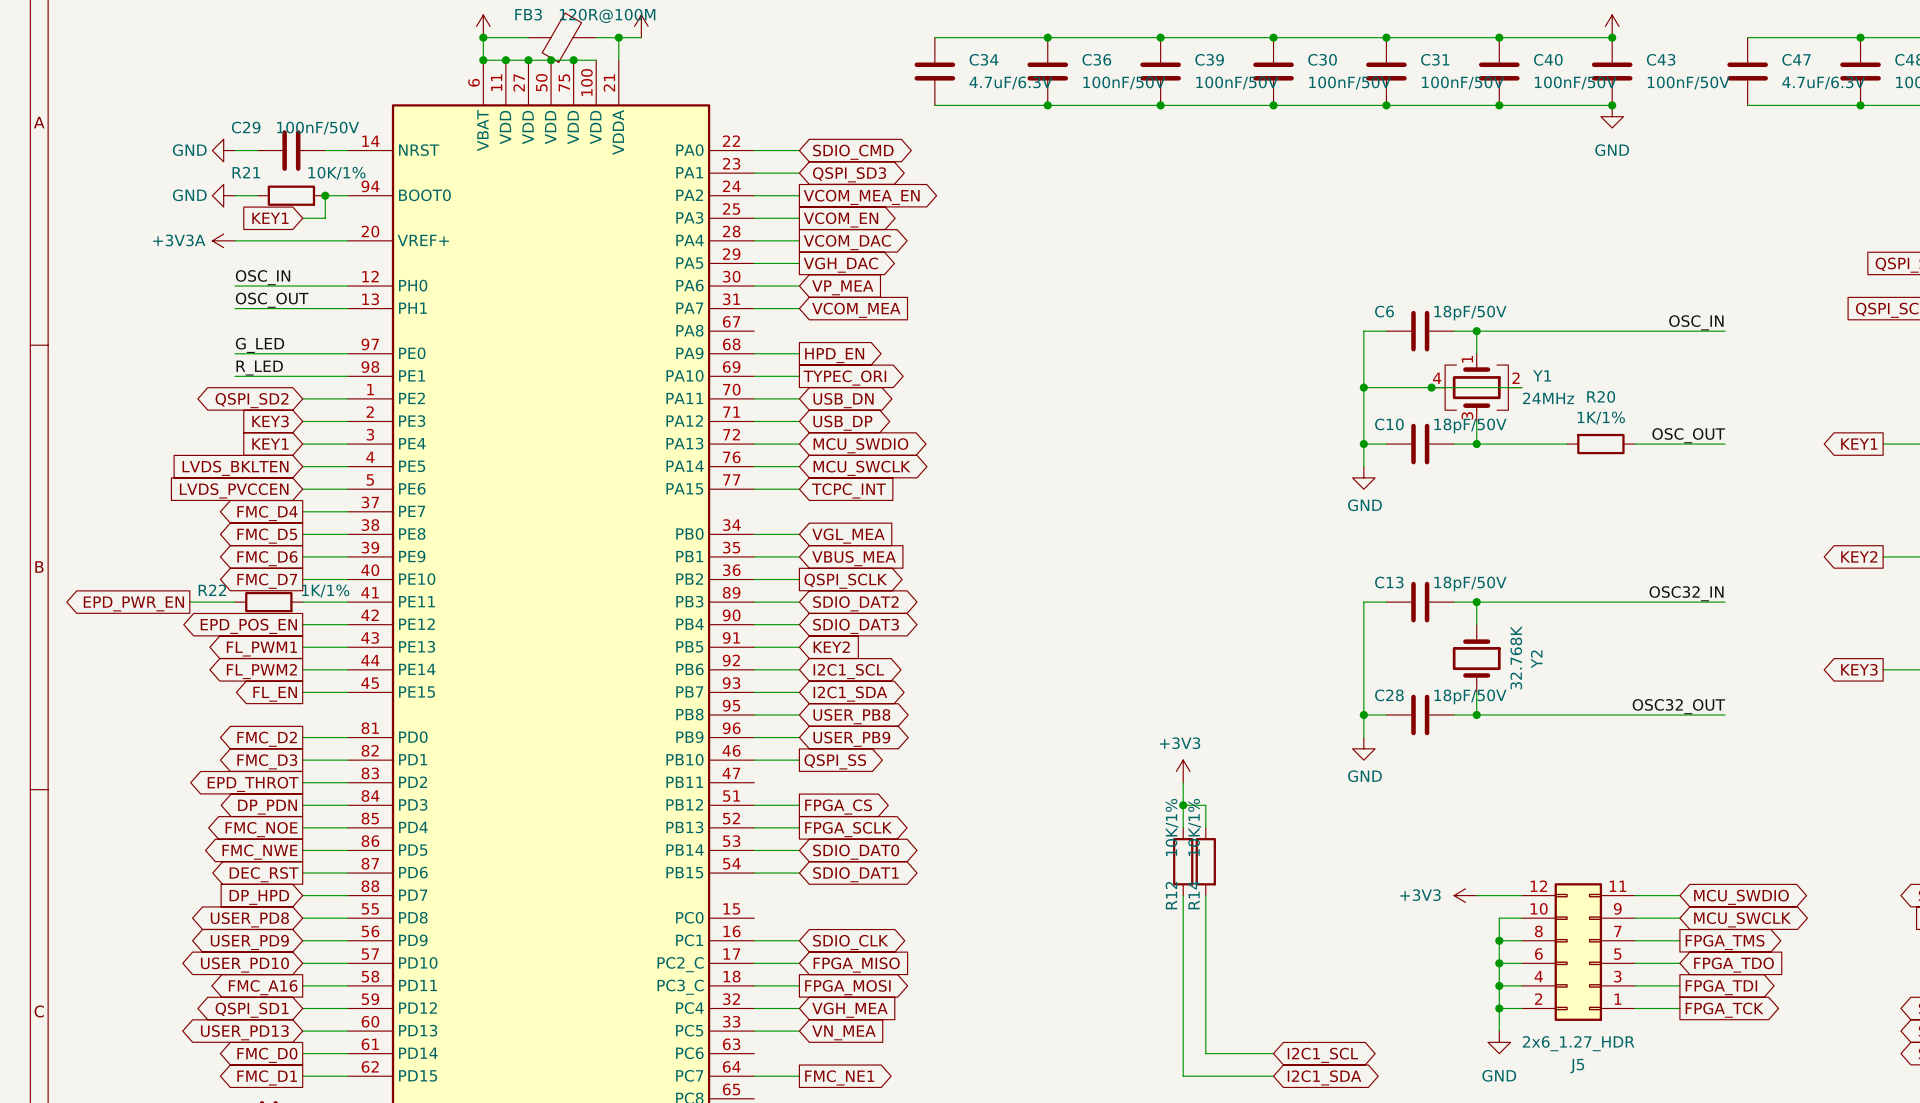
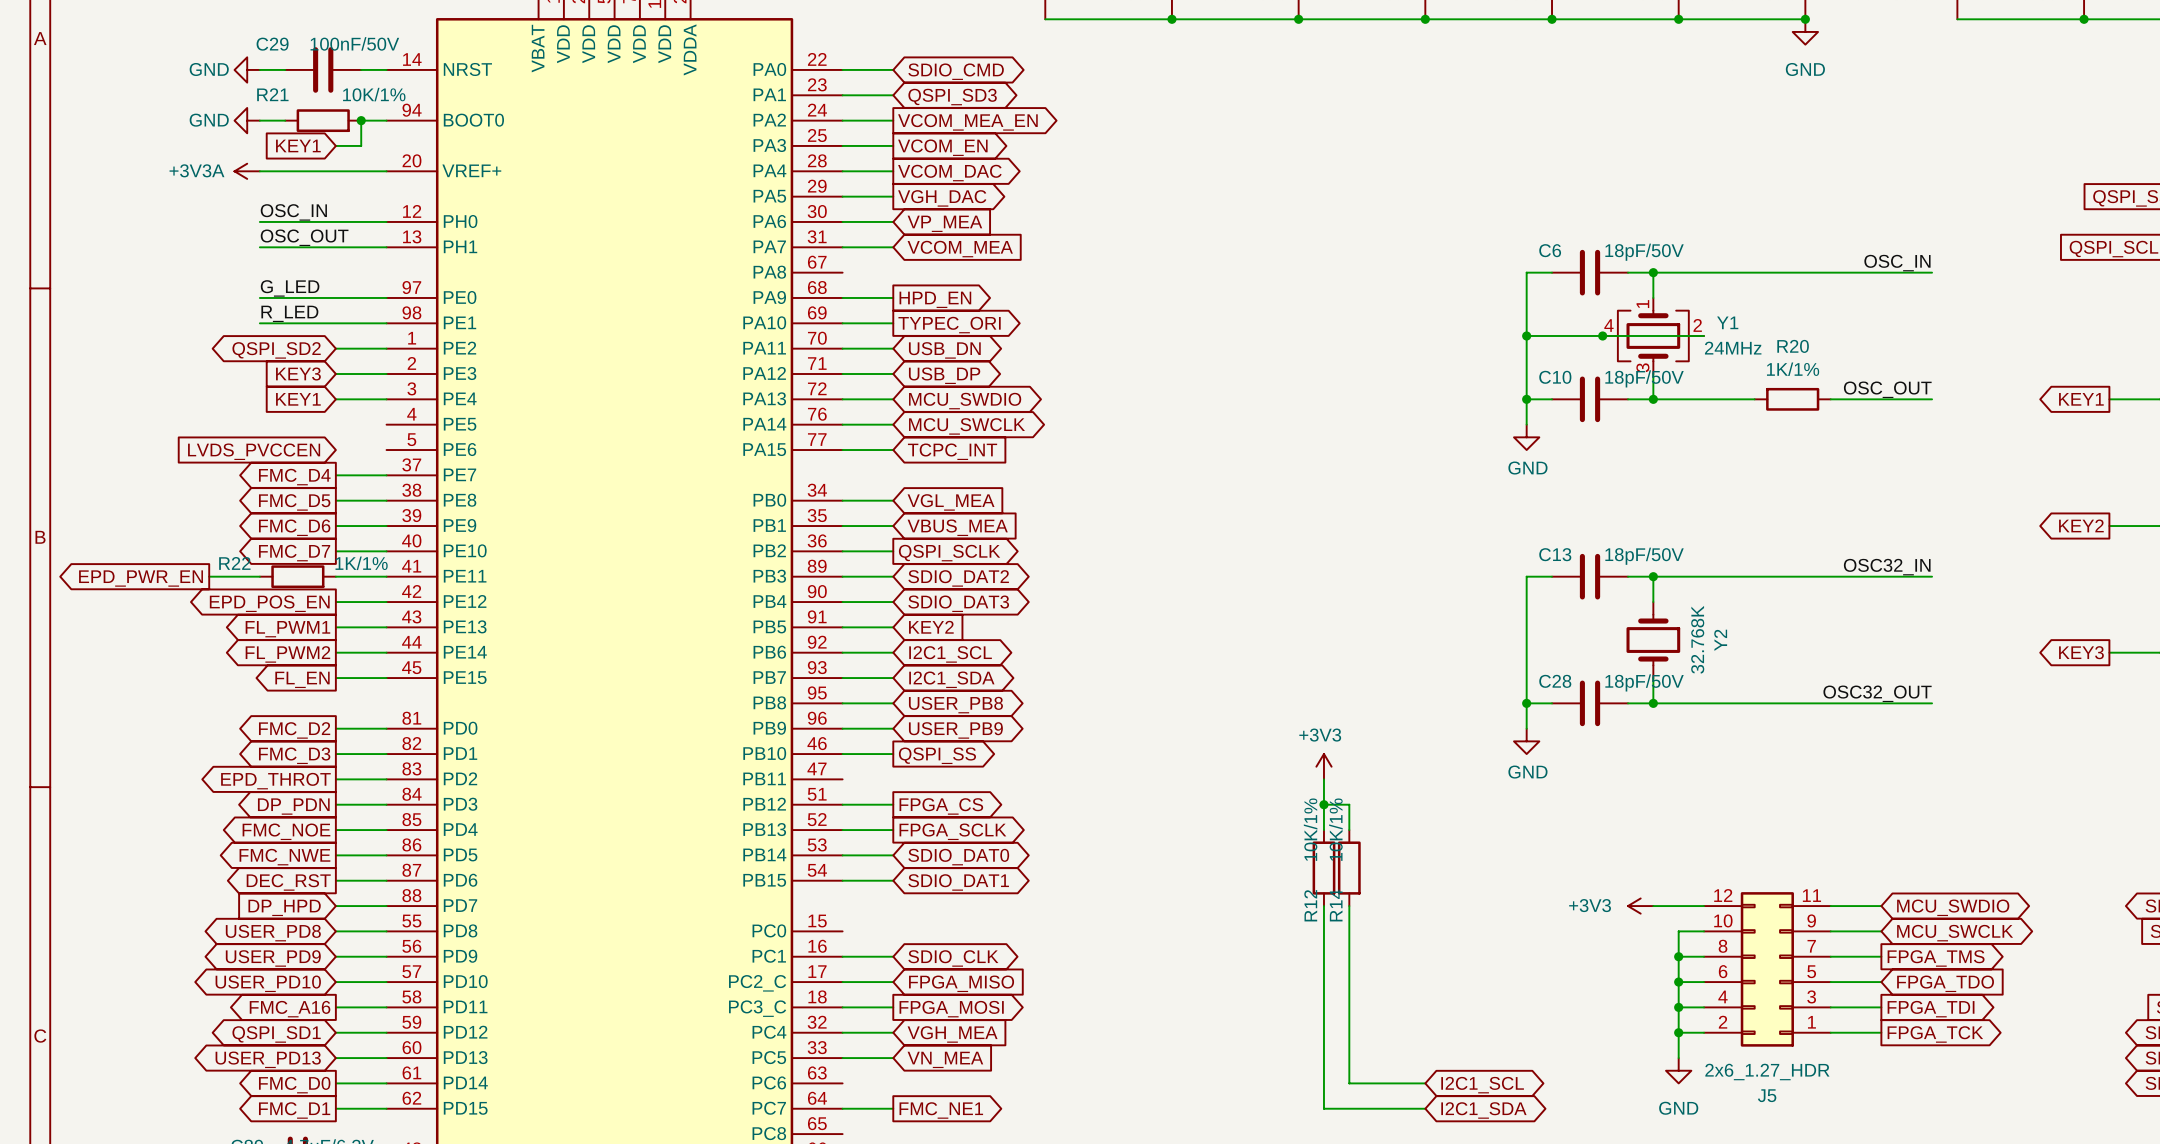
wire: (302, 466) (347, 466) -> none
global label: LVDS_BKLTEN (235, 468) -> none
wire: (302, 489) (347, 489) -> none

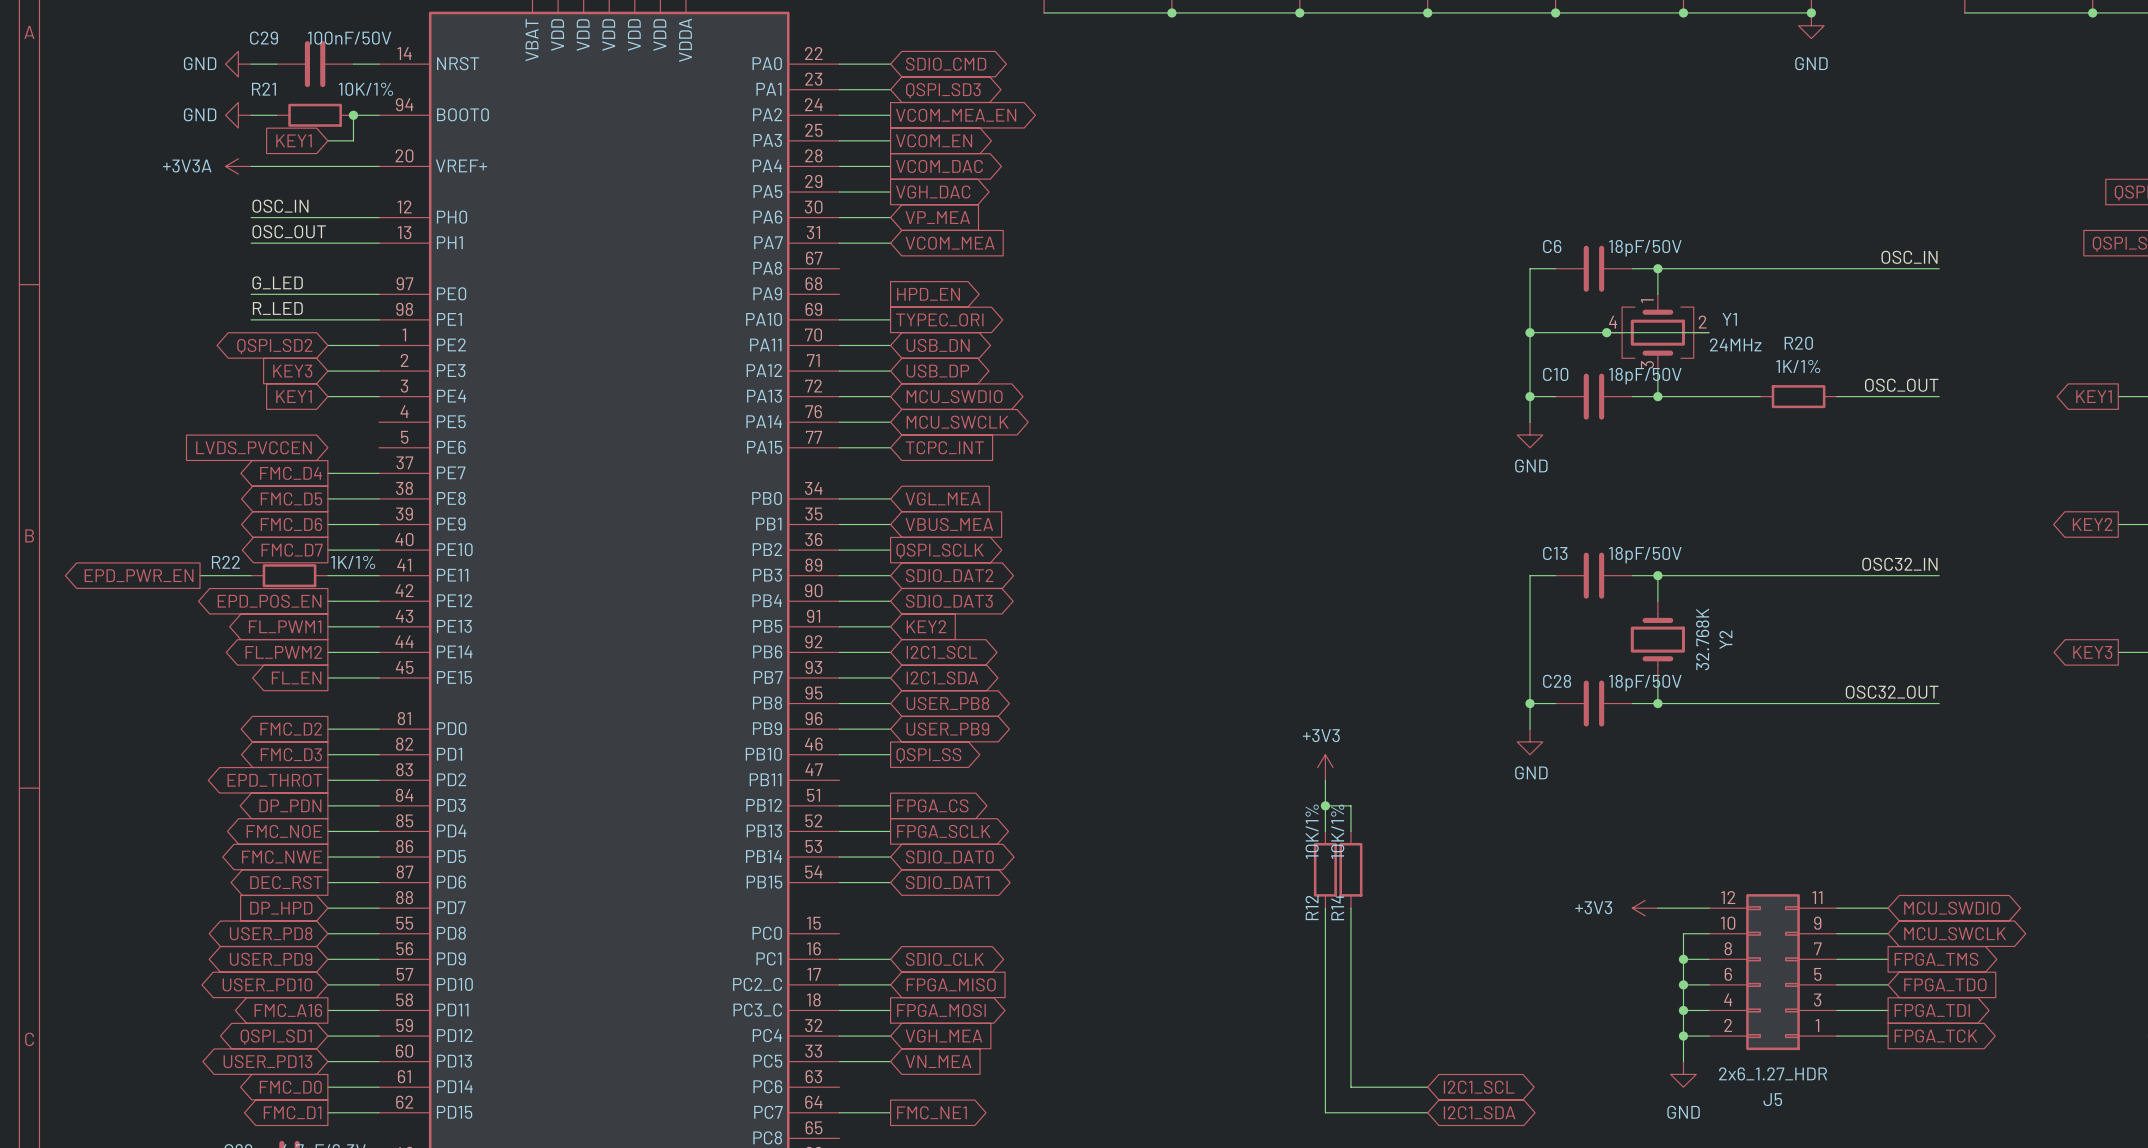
wire: (842, 297) (893, 297) -> none

